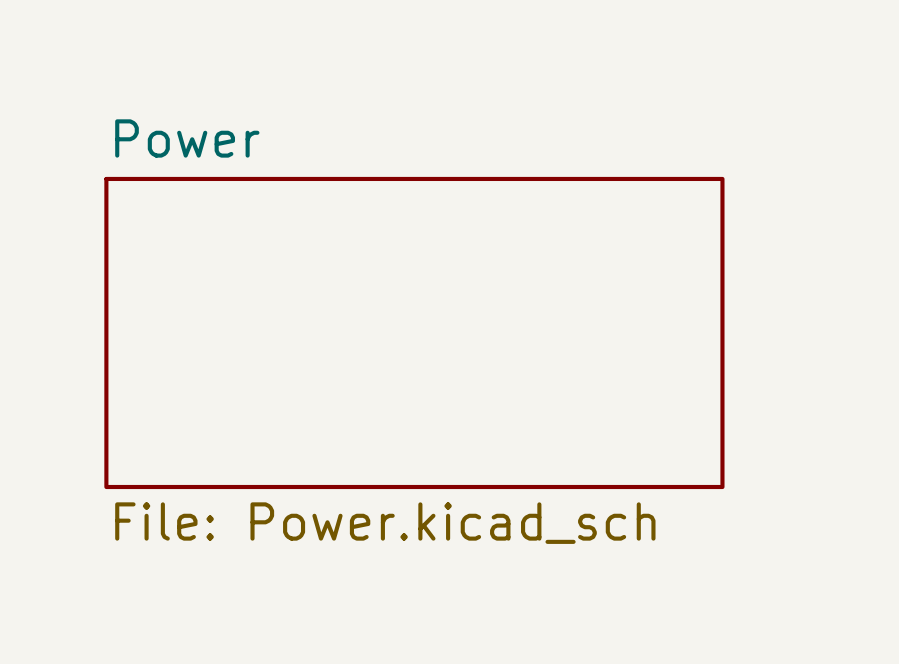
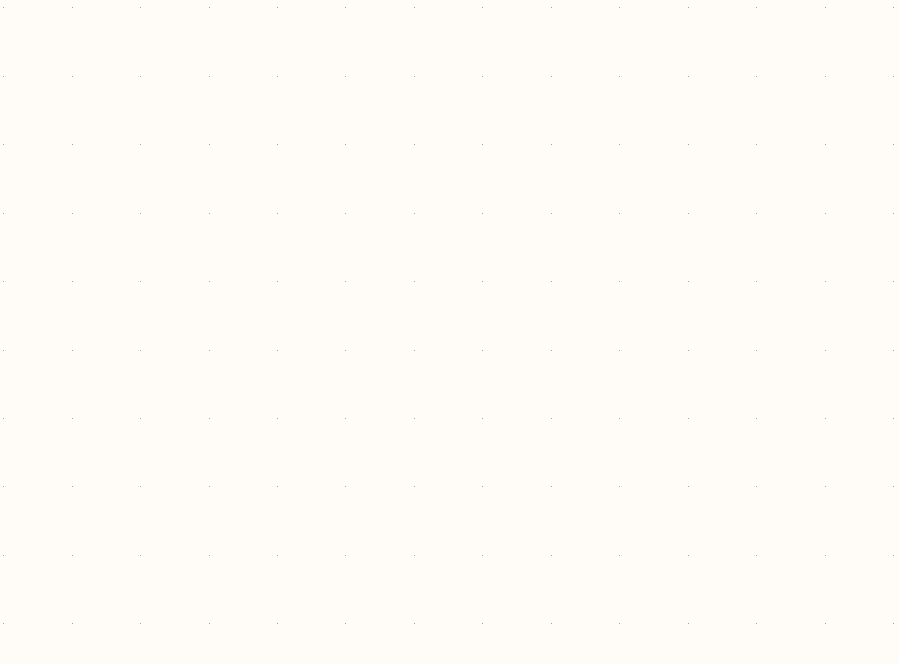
sheet Power: File: Power.kicad_sch (414, 332) -> none

